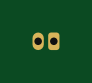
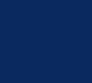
part: (45, 41) -> none

